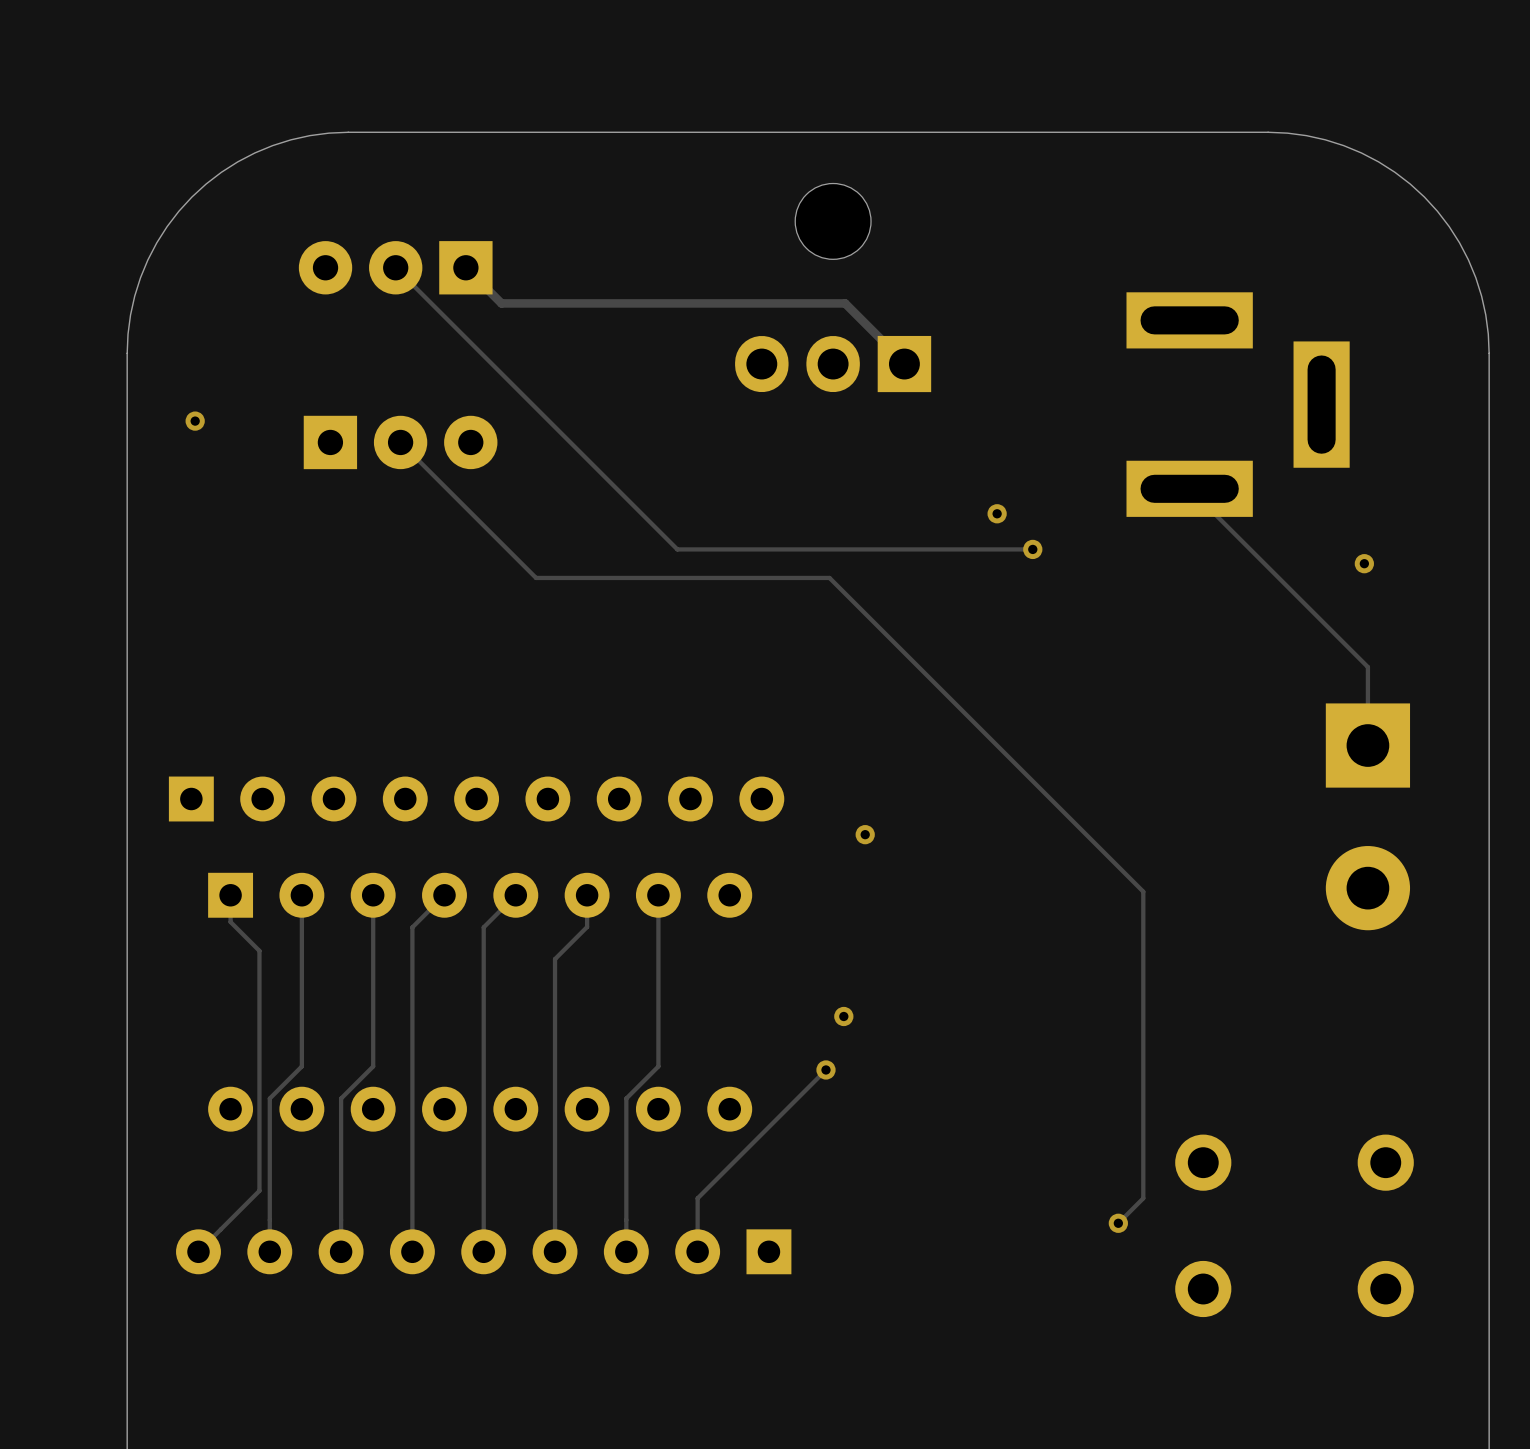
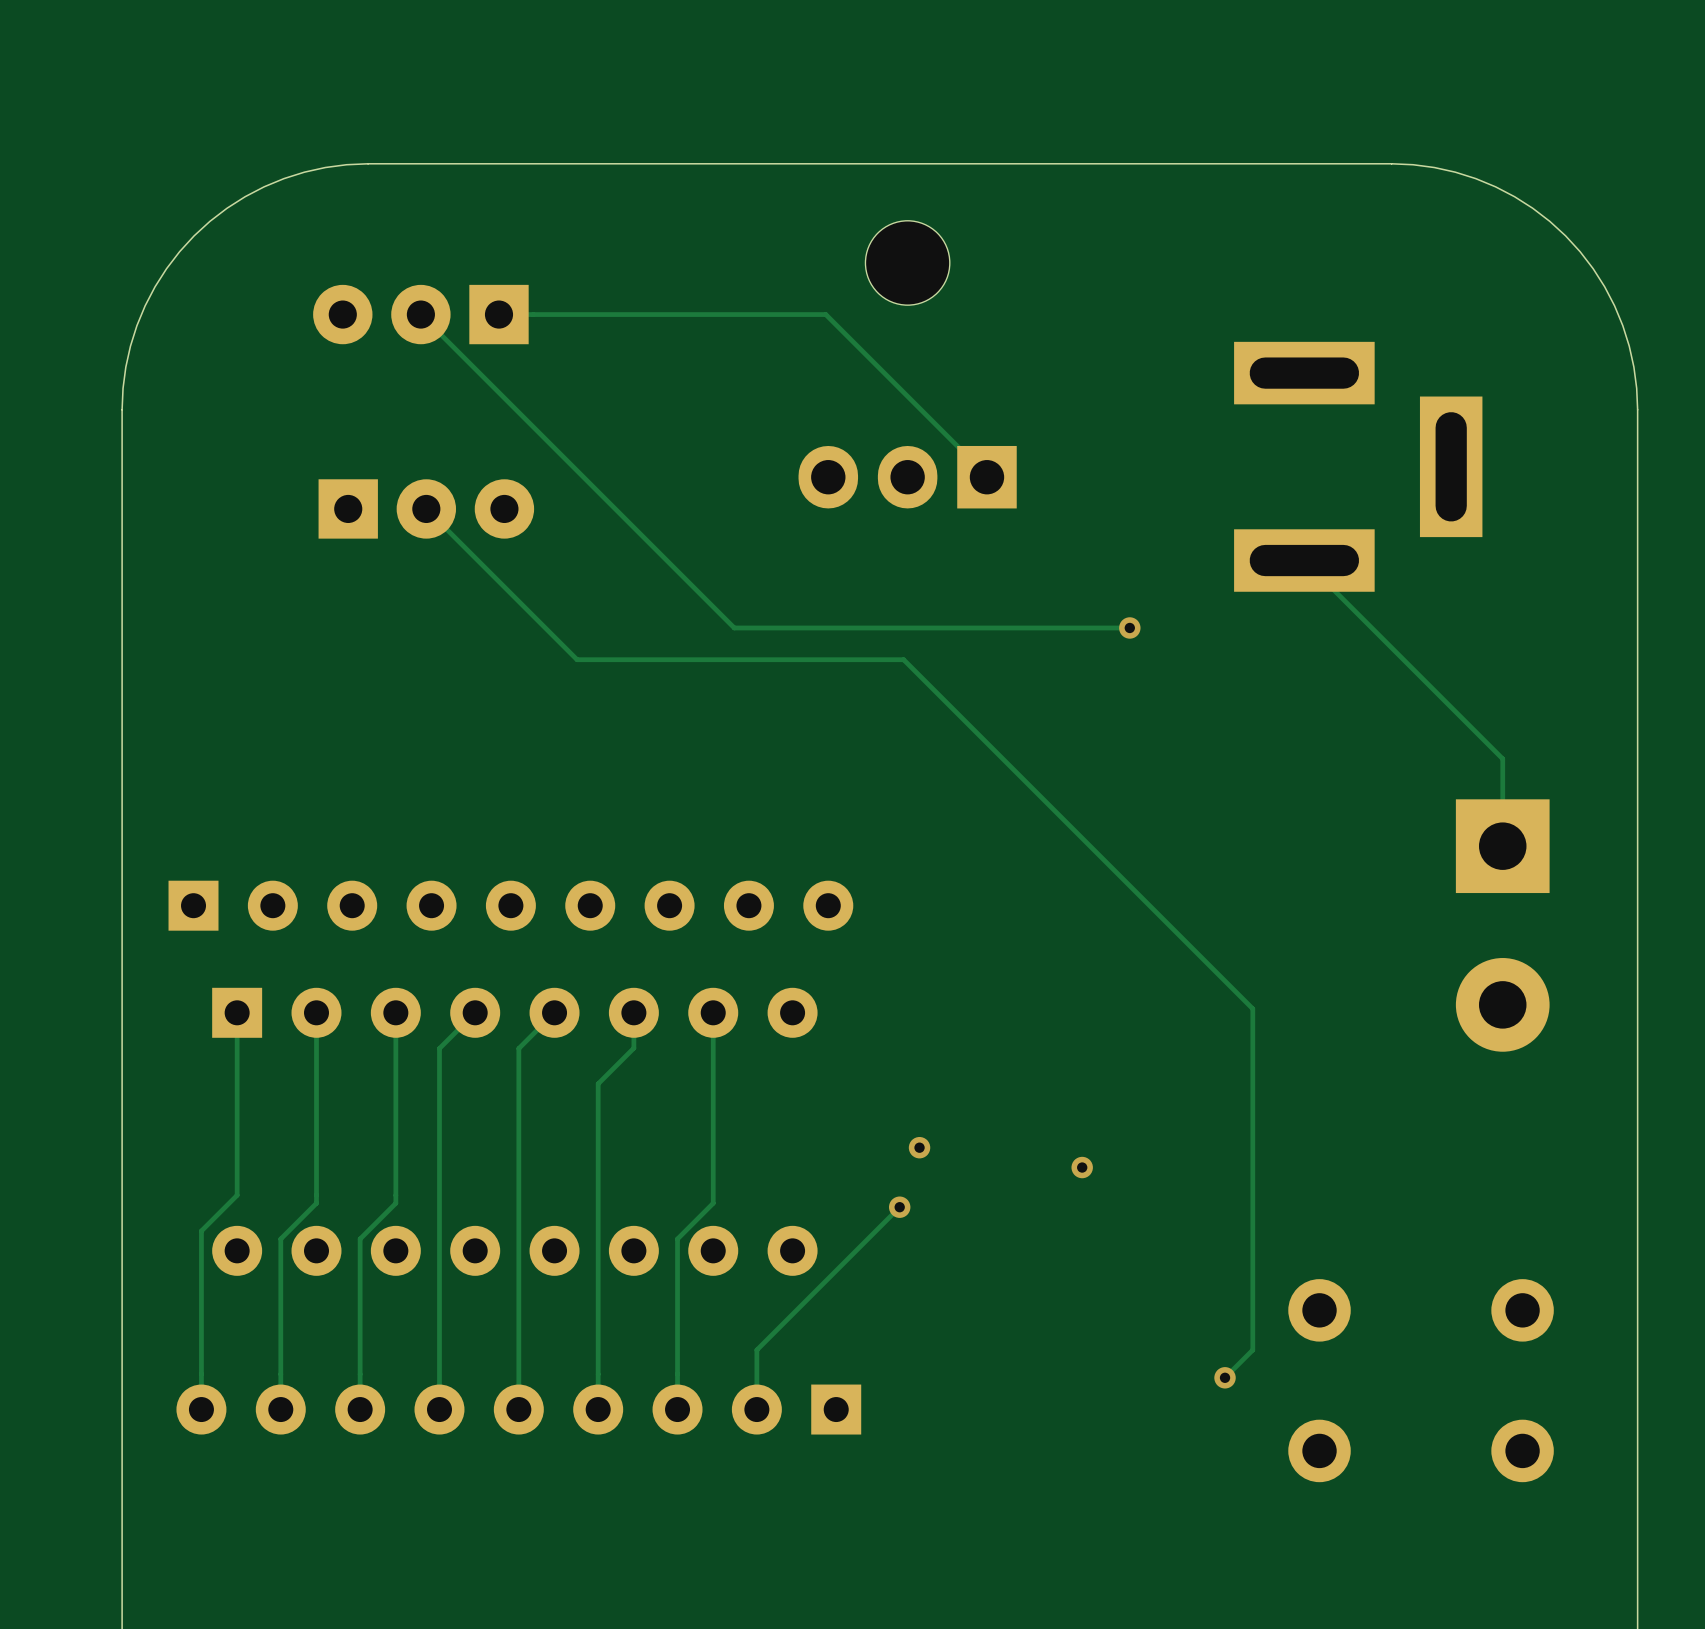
track: (465, 267) (501, 303) (845, 303) (904, 364) -> (499, 314) (825, 314) (986, 477)
part position: (833, 364) -> (907, 477)
via: (195, 421) -> none
via: (997, 513) -> none
via: (1364, 563) -> none
via: (865, 834) -> none
track: (230, 922) (259, 950) (259, 1190) (198, 1251) -> (237, 1042) (237, 1195) (201, 1231) (201, 1409)
via: none -> (1082, 1167)

